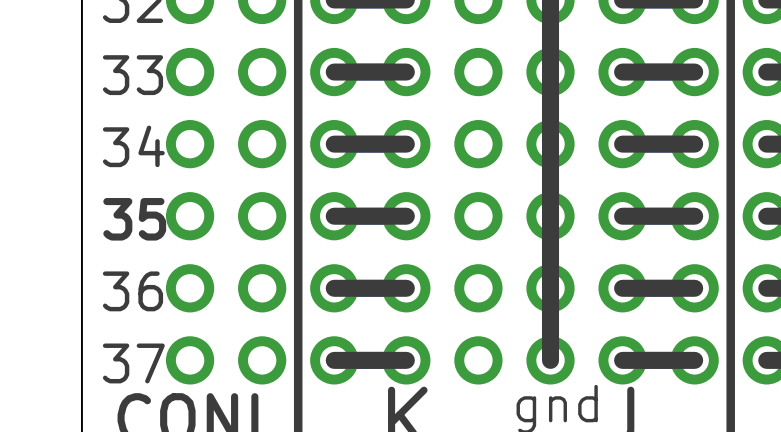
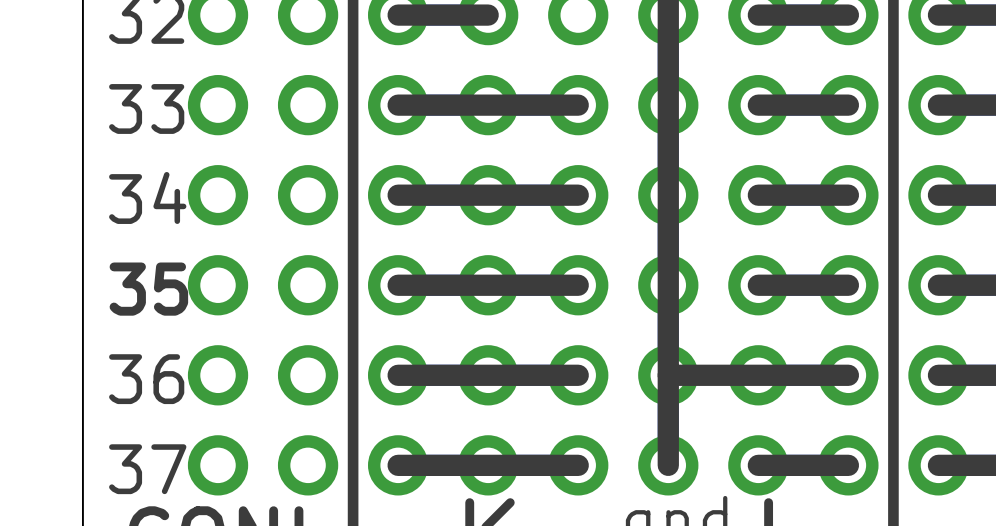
line: none -> (578, 105) (488, 105)
line: none -> (578, 195) (488, 195)
line: none -> (578, 285) (488, 285)
line: none -> (578, 375) (488, 375)
line: none -> (758, 375) (668, 375)
line: none -> (578, 465) (488, 465)

